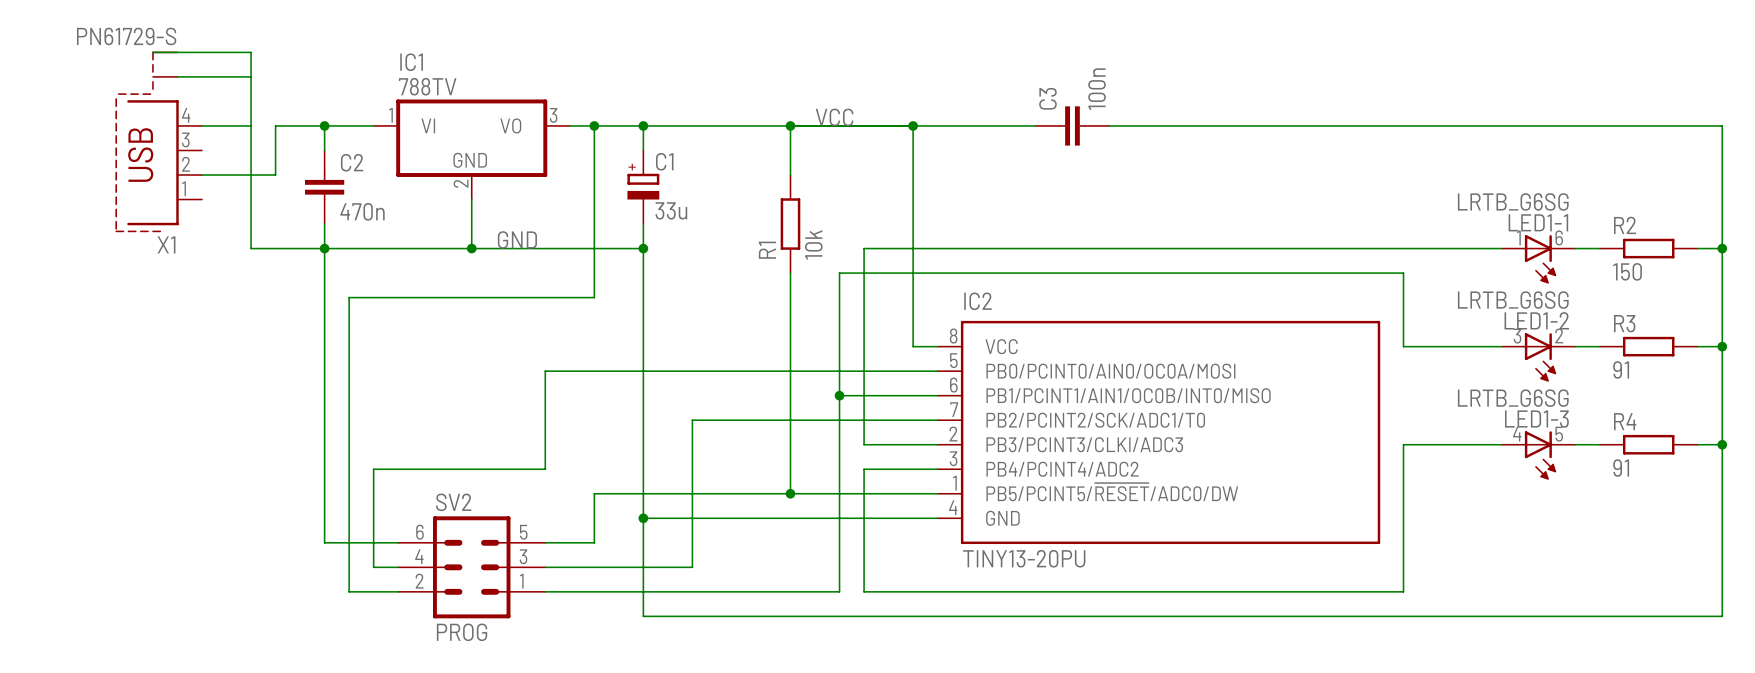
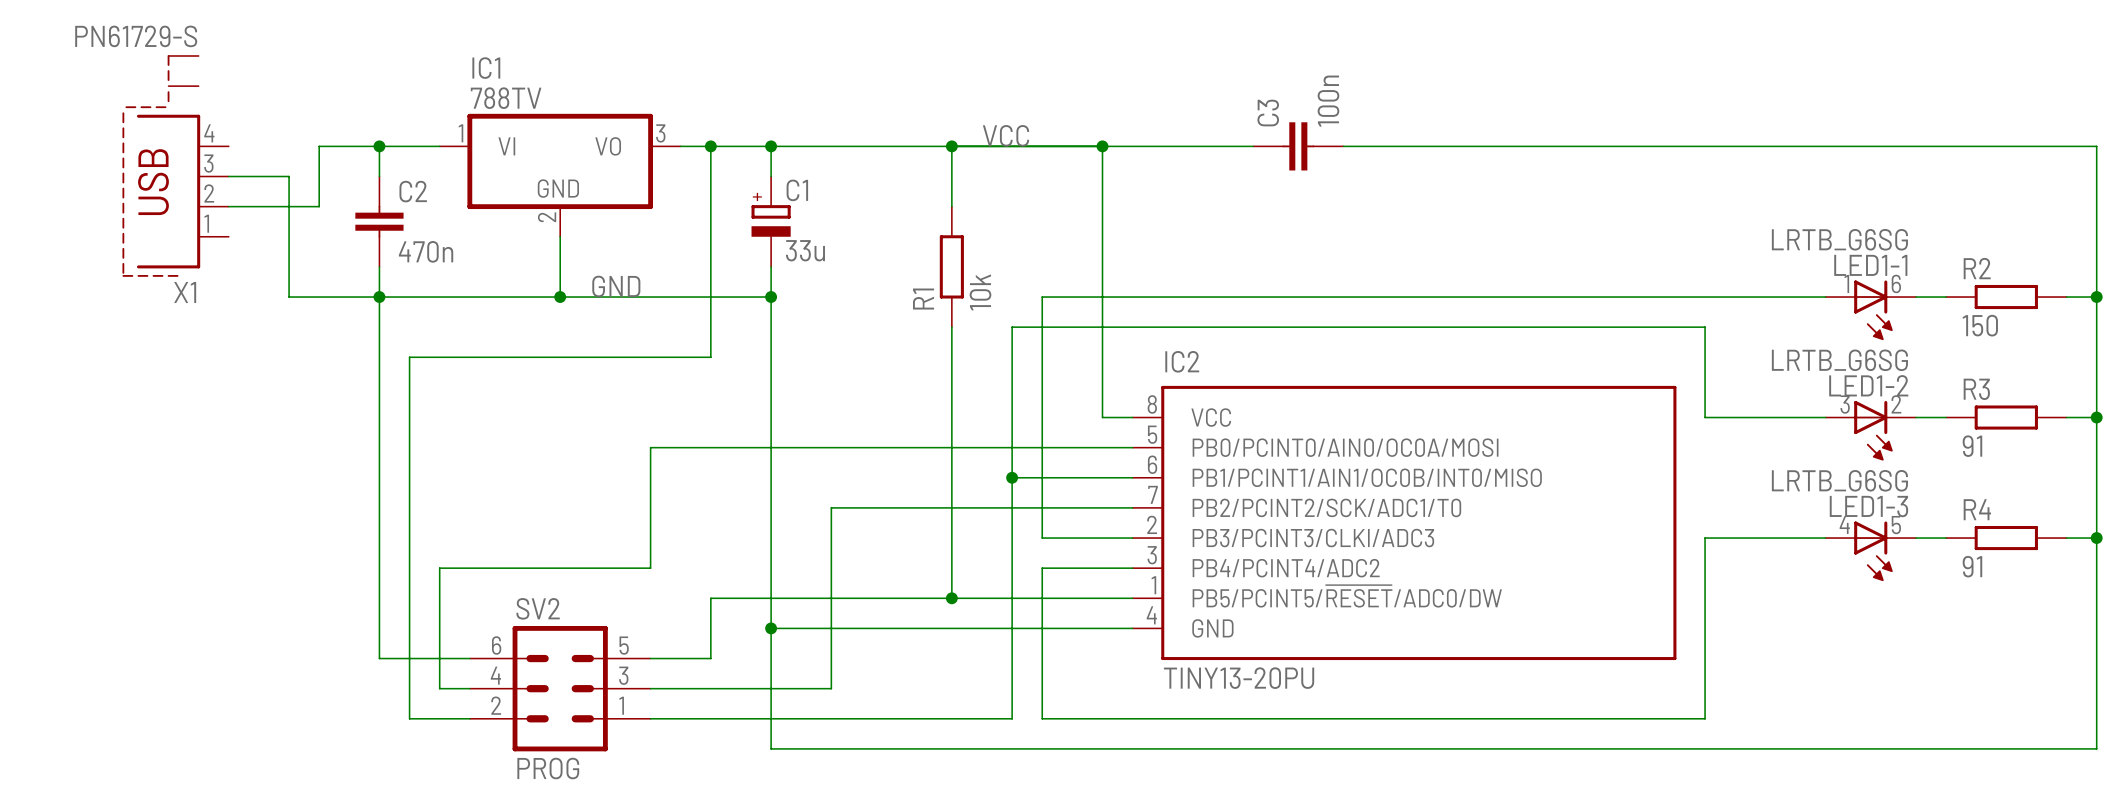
wire: (152, 52) (251, 52) (251, 150) -> (228, 176) (289, 176)
wire: (177, 76) (251, 76) -> none
wire: (202, 125) (251, 125) -> none

